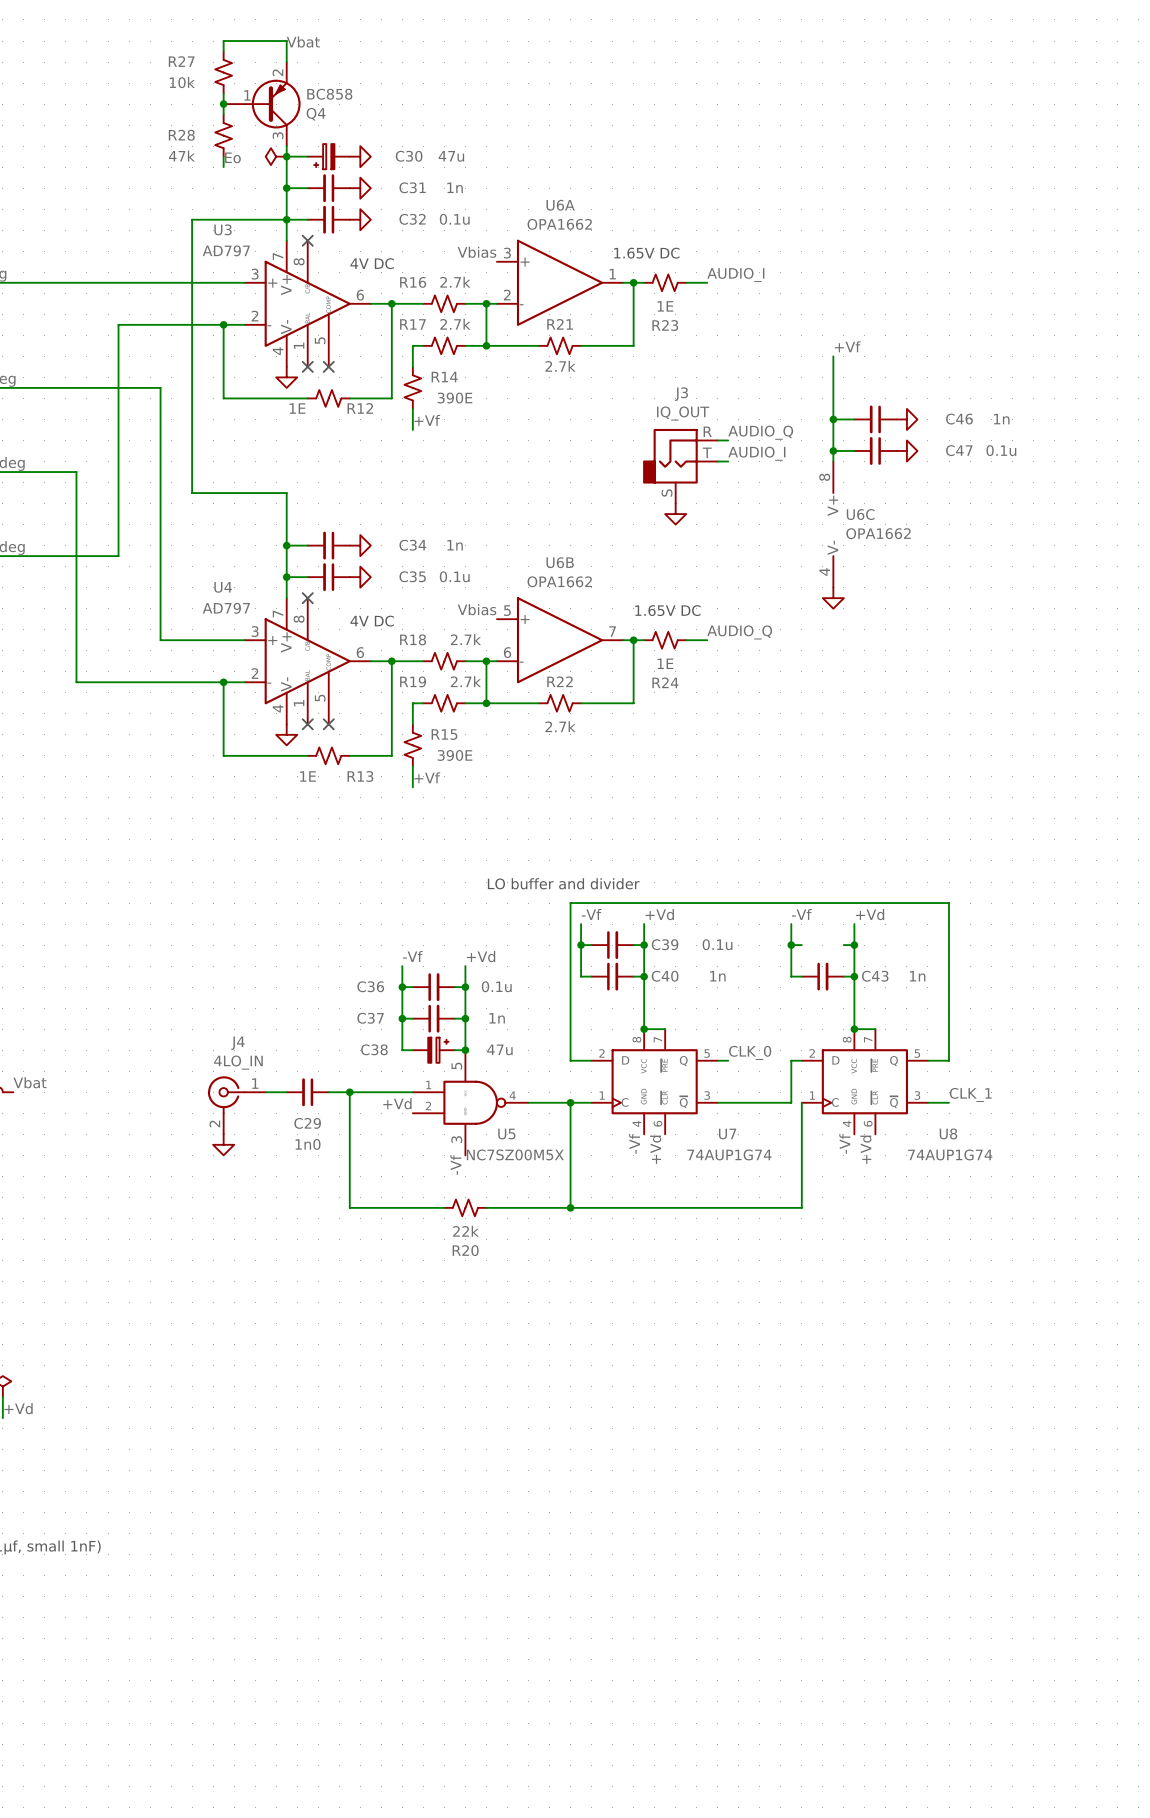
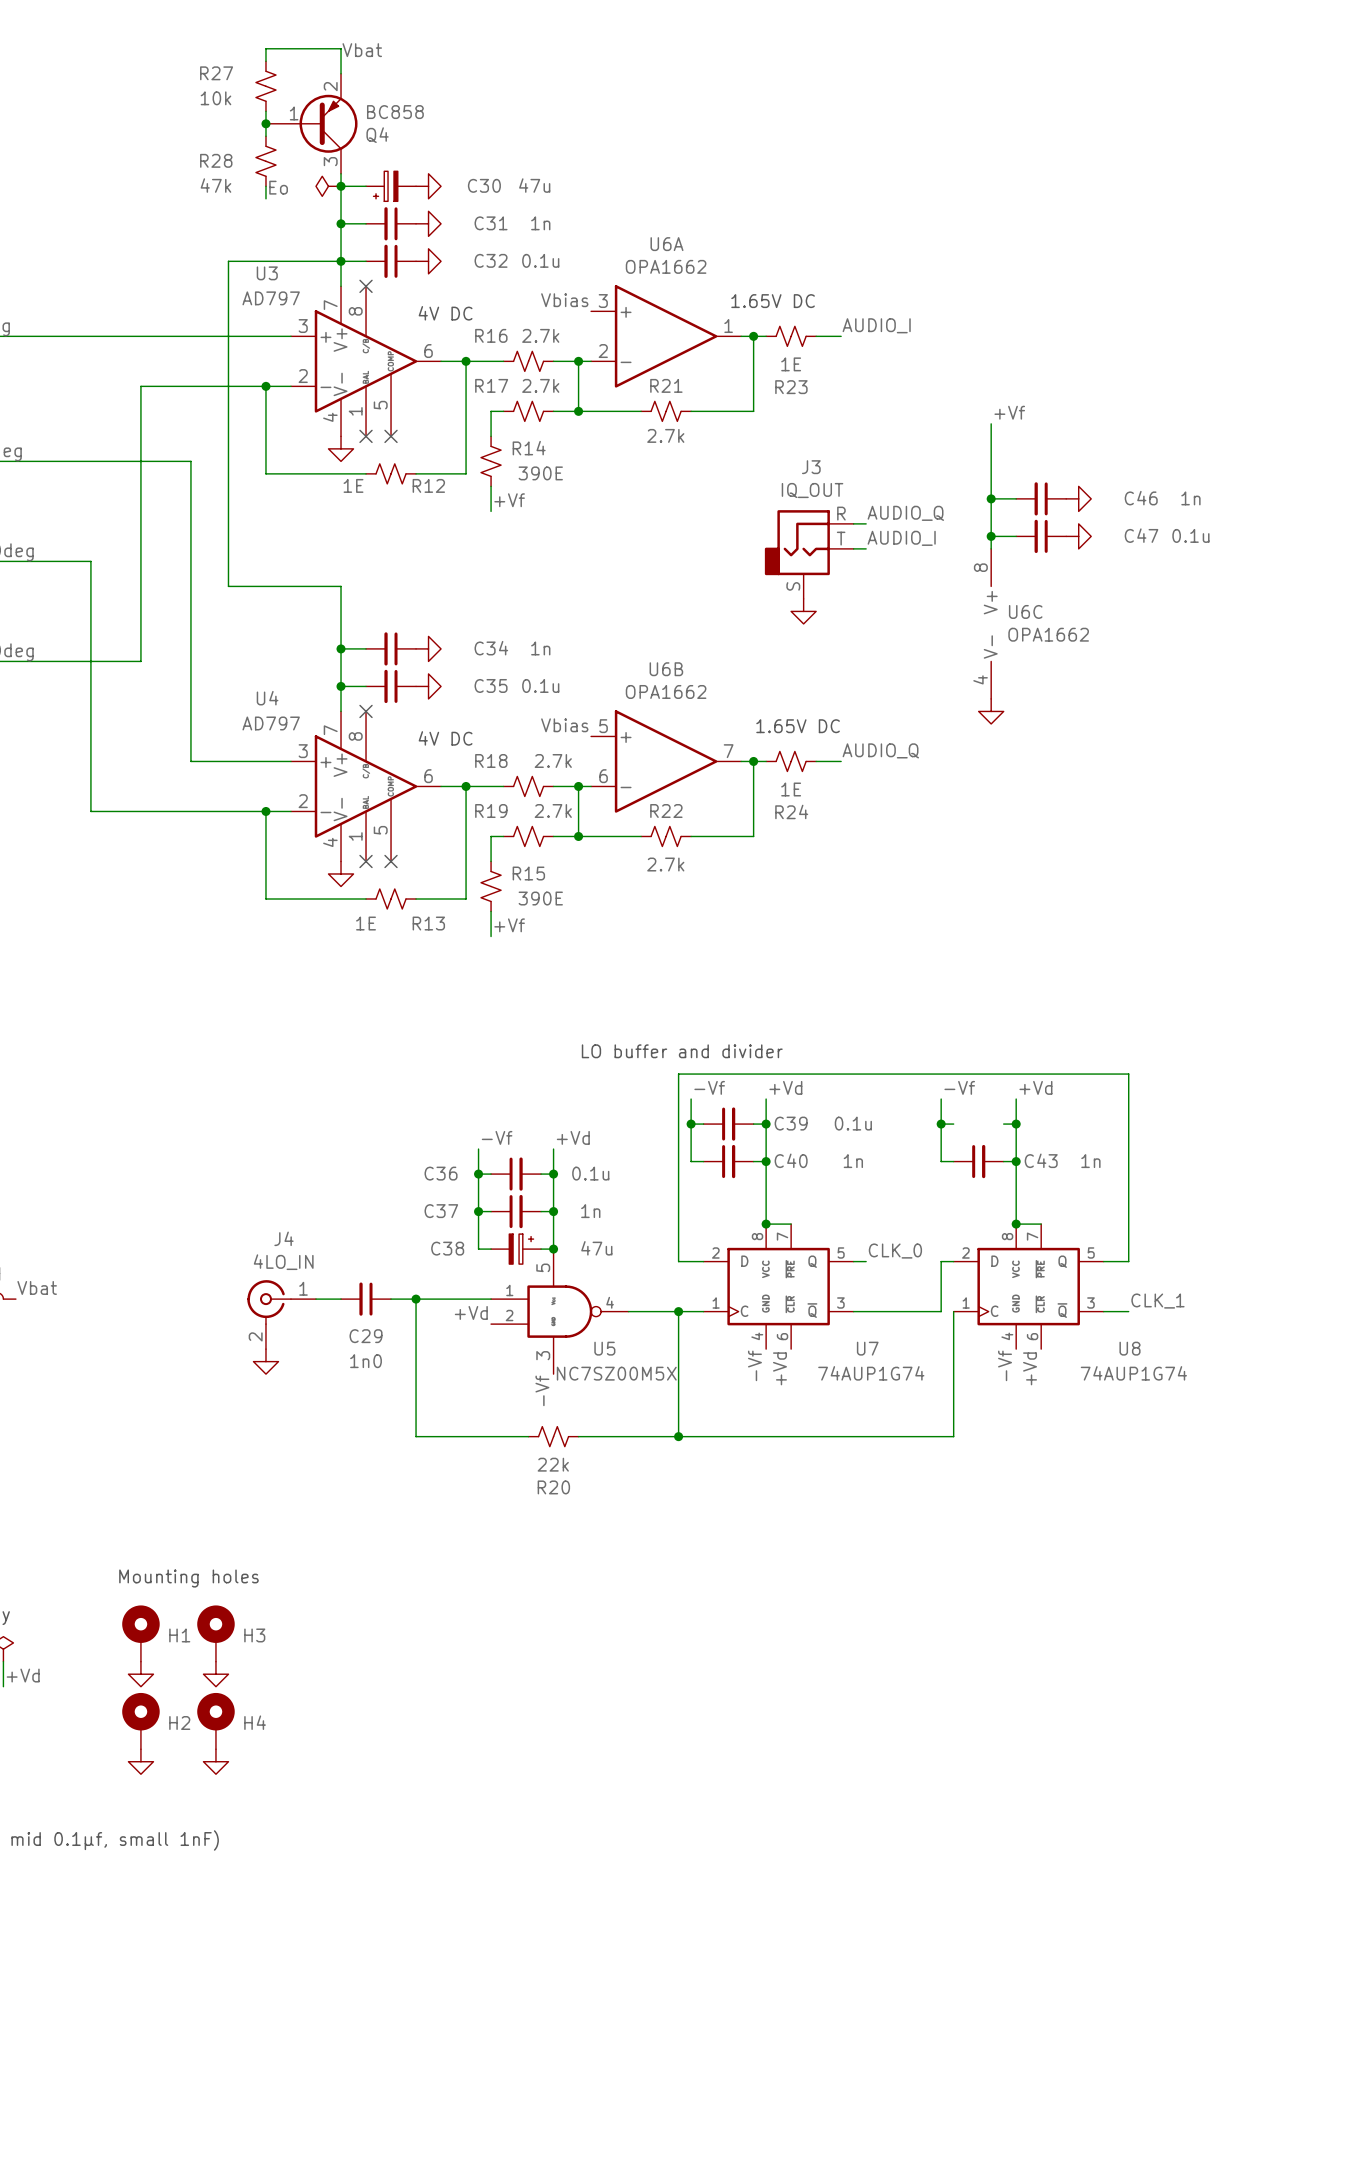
text: none -> Mounting holes (188, 1578)
H1: none -> (140, 1633)
H3: none -> (215, 1633)
power symbol: none -> (140, 1674)
power symbol: none -> (215, 1674)
H2: none -> (140, 1721)
H4: none -> (215, 1721)
power symbol: none -> (140, 1761)
power symbol: none -> (215, 1761)

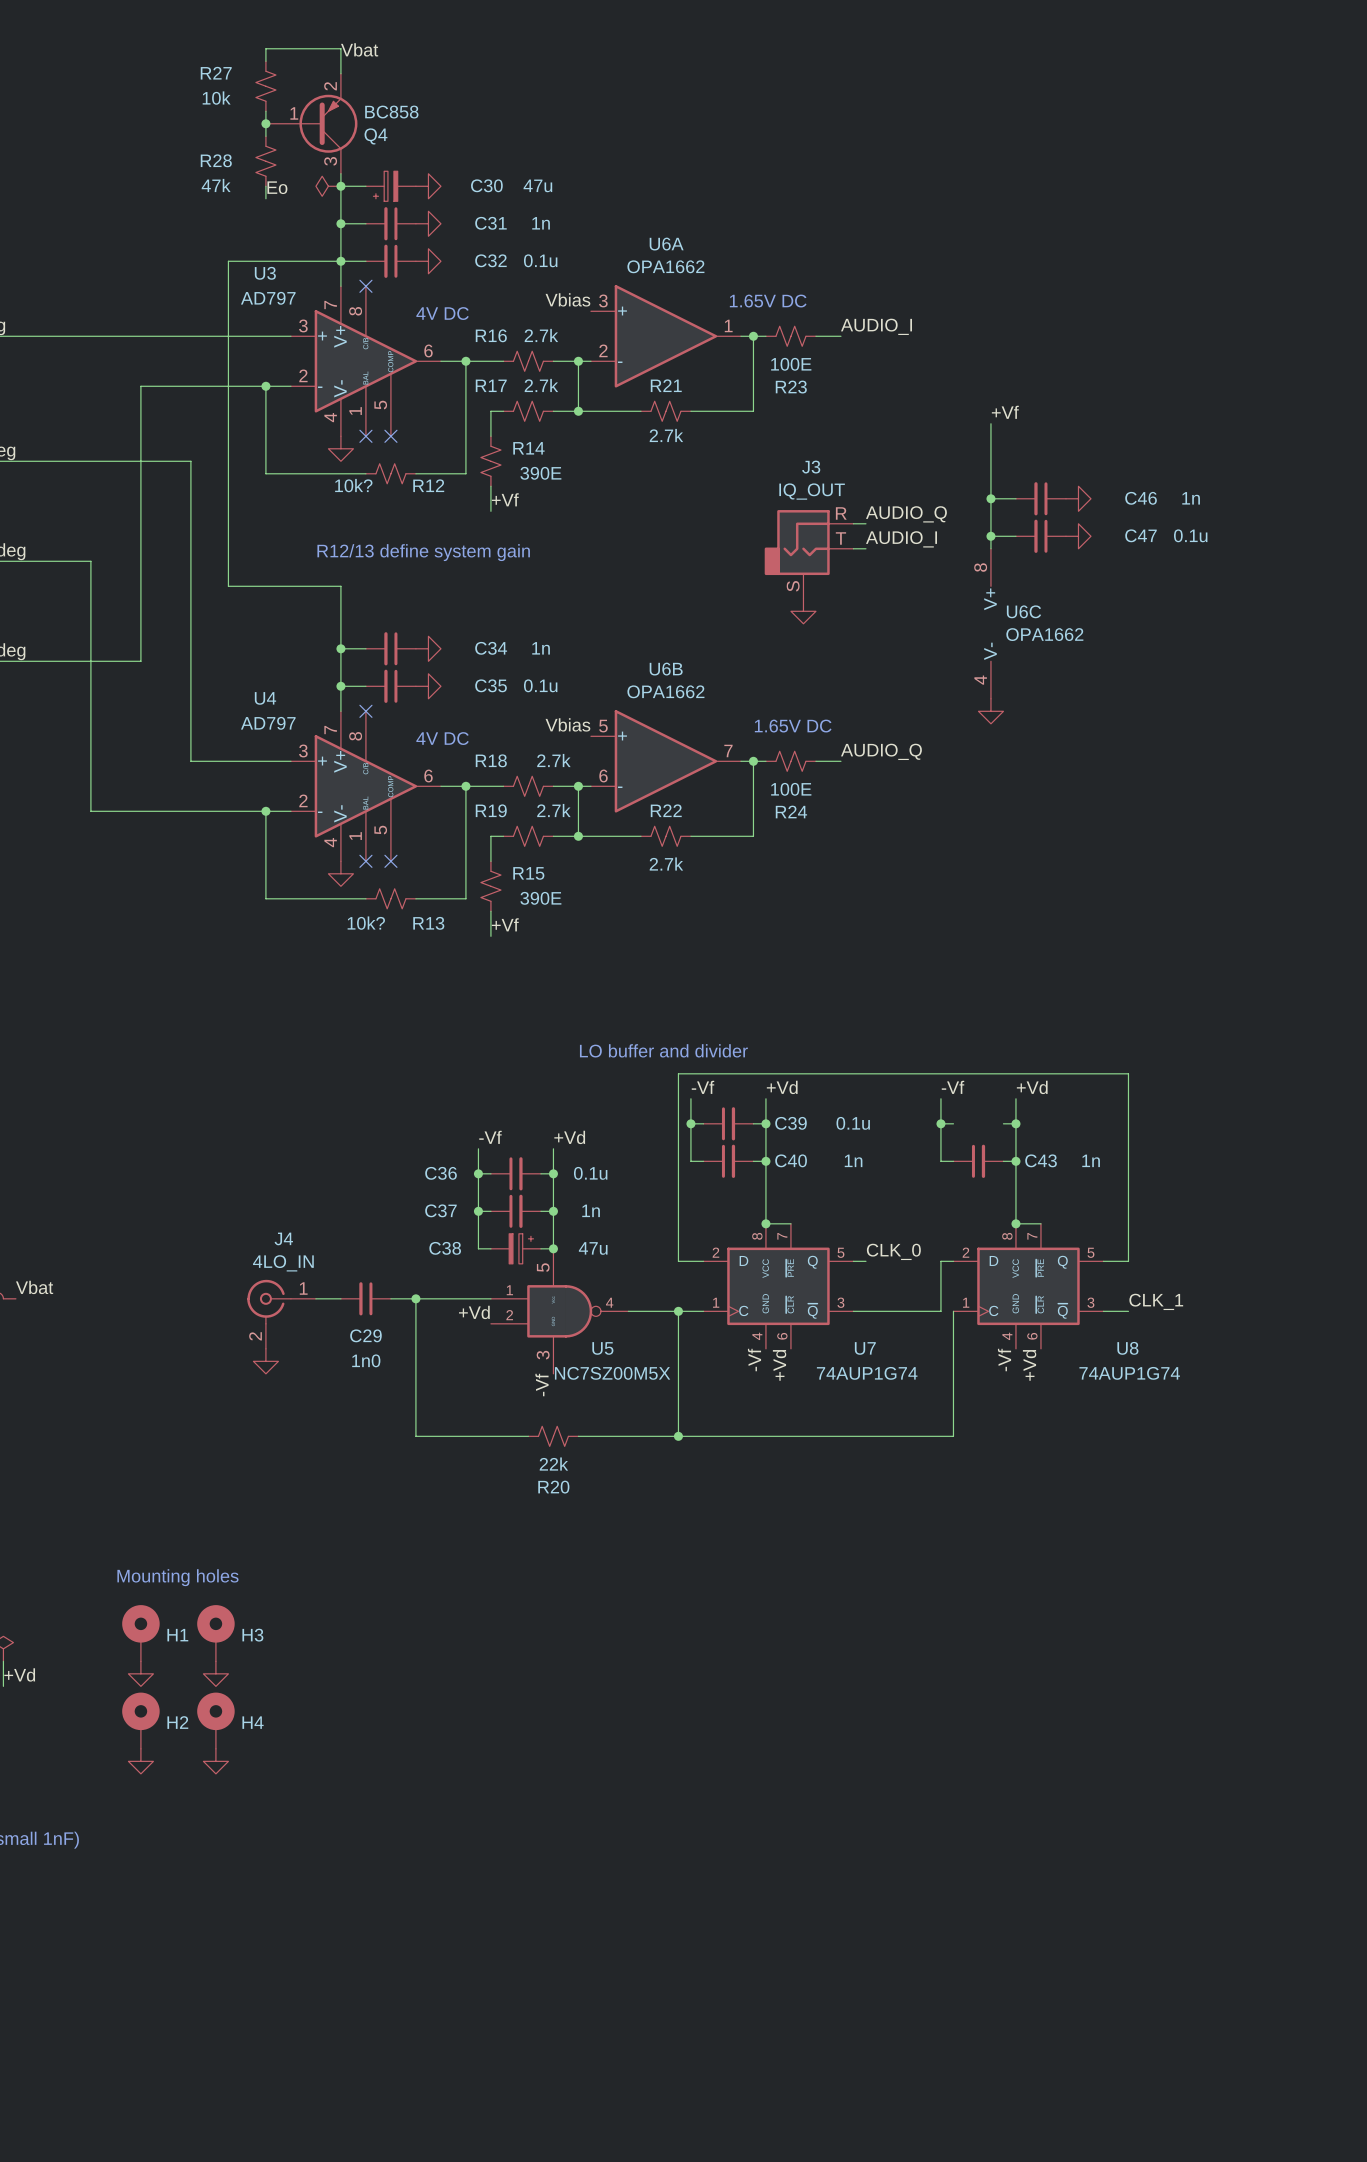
R23 value: 1E (791, 364) -> 100E (791, 364)
R12 value: 1E (353, 485) -> 10k? (353, 485)
text: none -> R12/13 define system gain (423, 552)
R24 value: 1E (791, 789) -> 100E (791, 789)
R13 value: 1E (366, 923) -> 10k? (366, 923)

